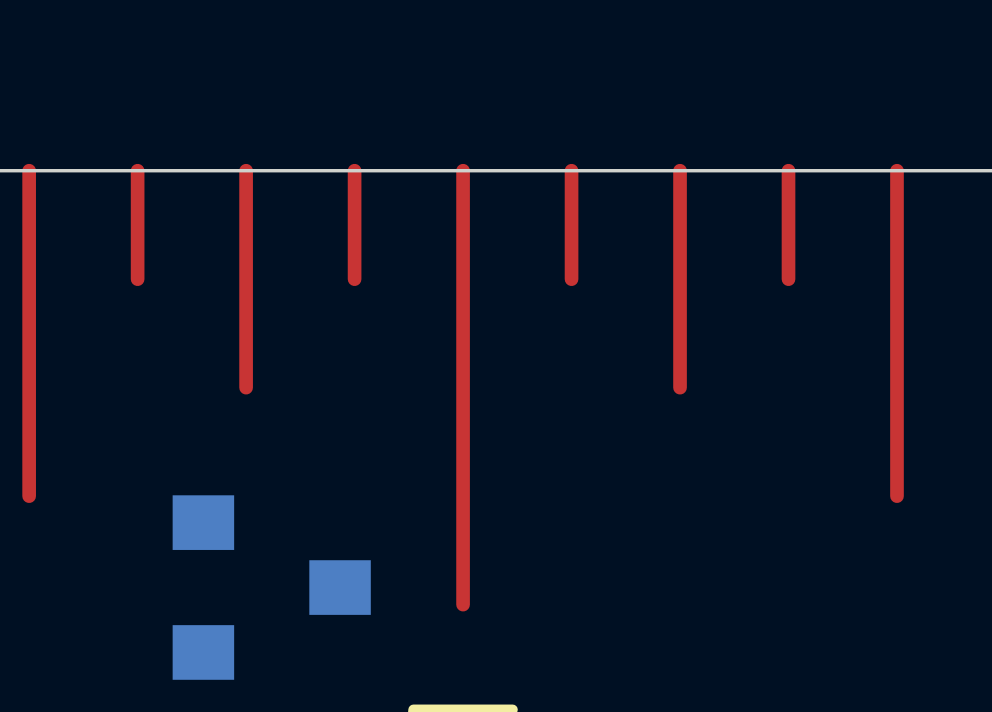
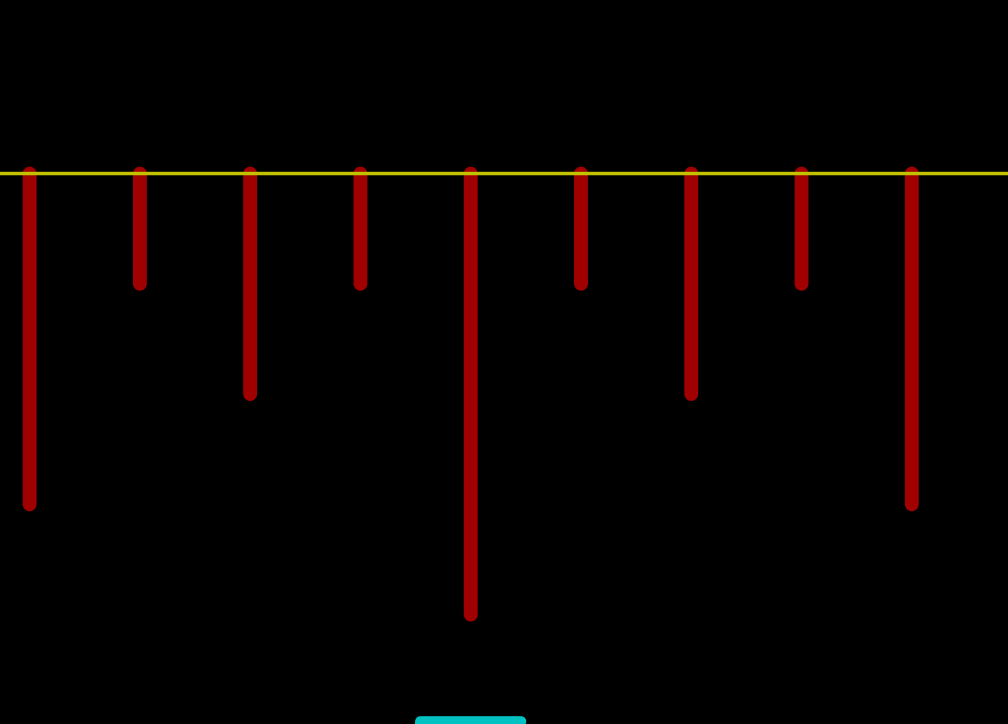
part: (271, 587) -> none

